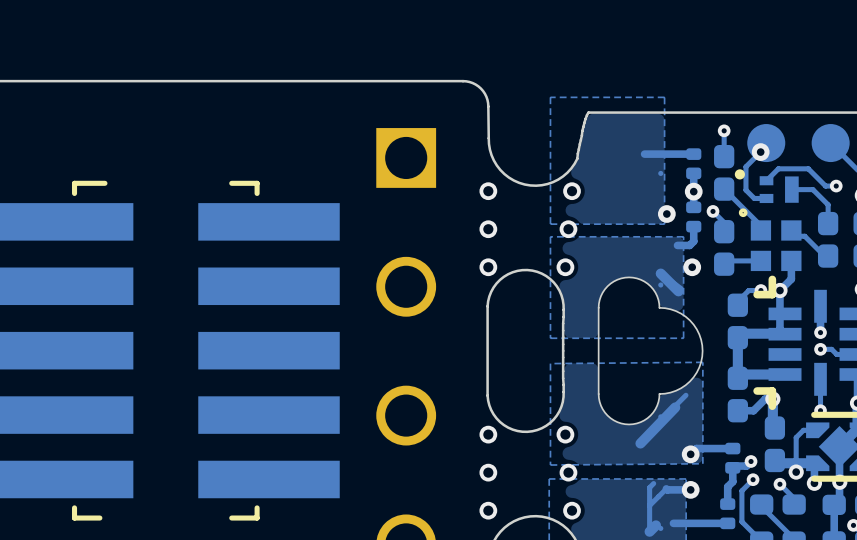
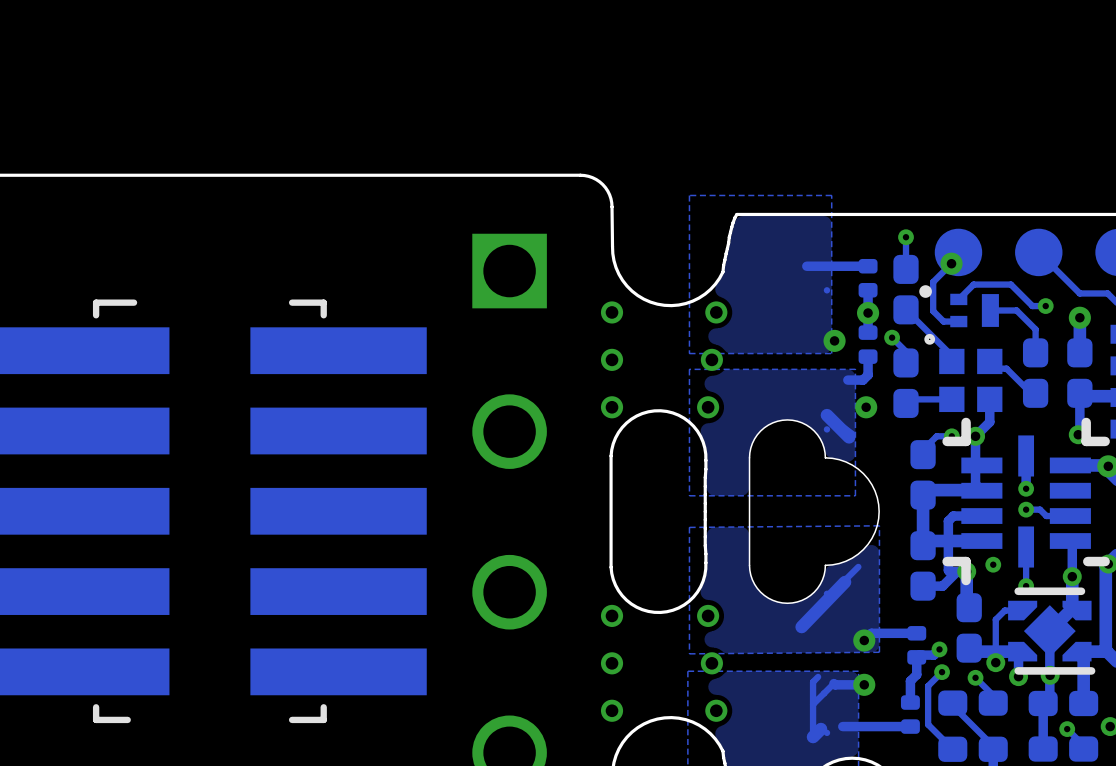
track: none -> (981, 516) (953, 516) (948, 521) (948, 570) (957, 571)
via: none -> (993, 564)

